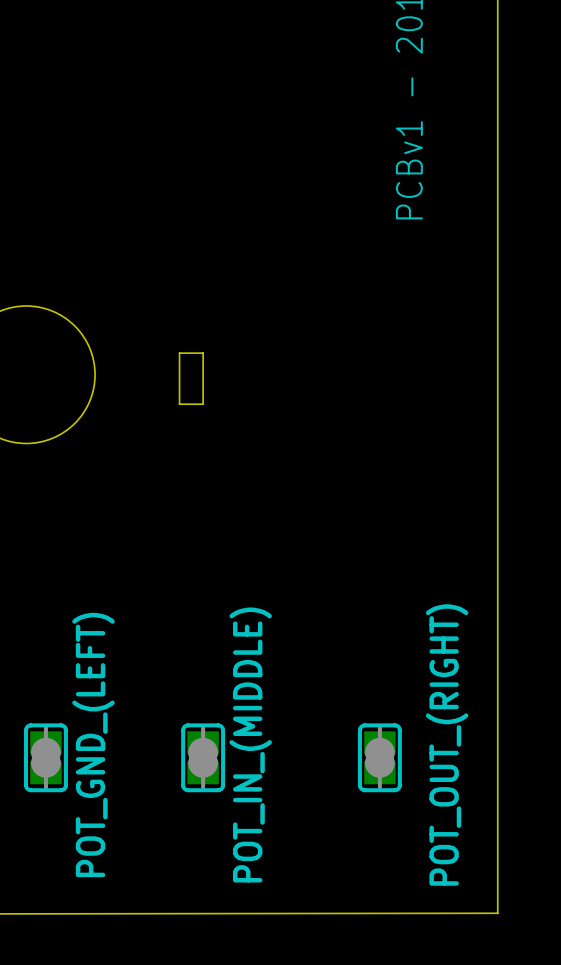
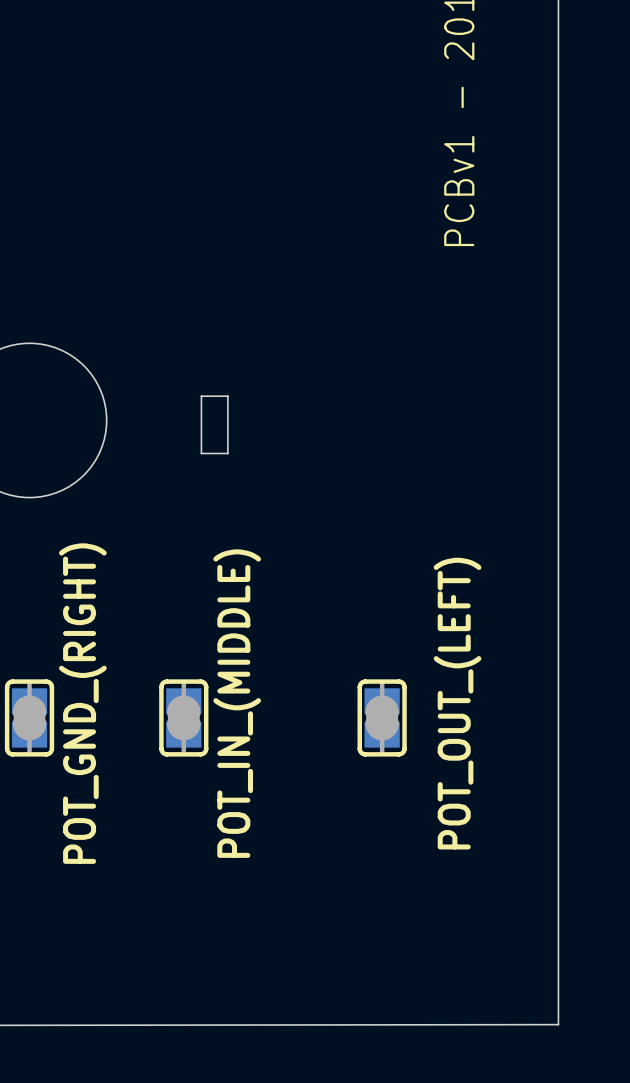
POT_GND_(RIGHT): none -> (29, 717)
POT_OUT_(LEFT): none -> (382, 717)
POT_GND_(LEFT): (45, 757) -> none
POT_IN_(MIDDLE) position: (203, 757) -> (183, 717)
POT_OUT_(RIGHT): (379, 757) -> none

